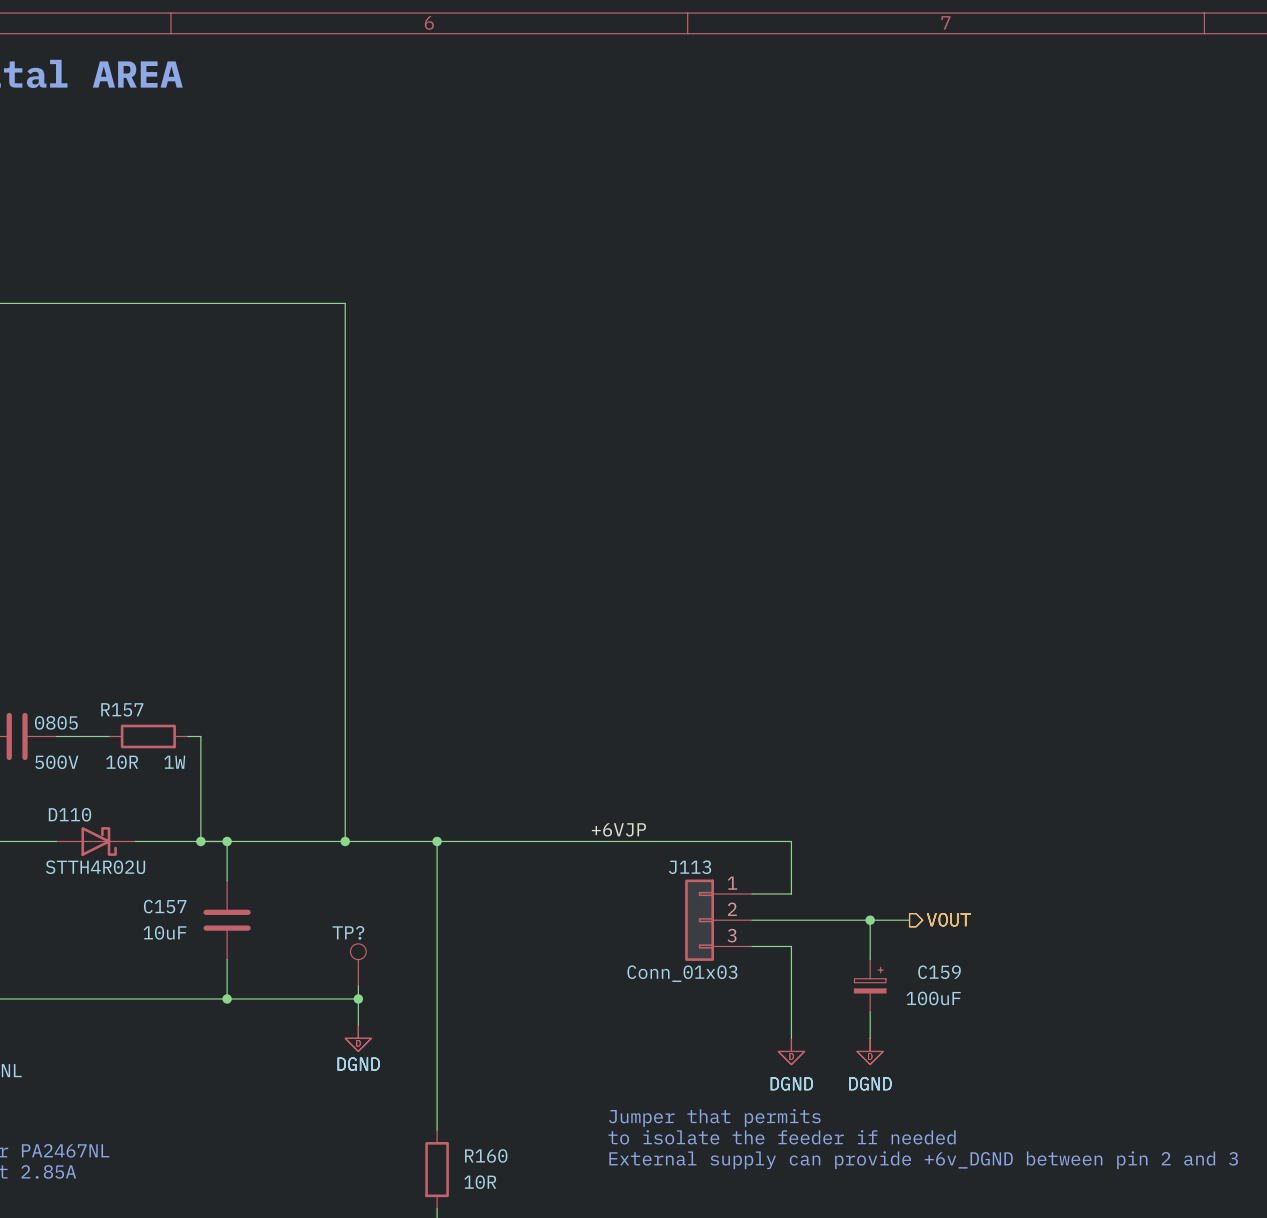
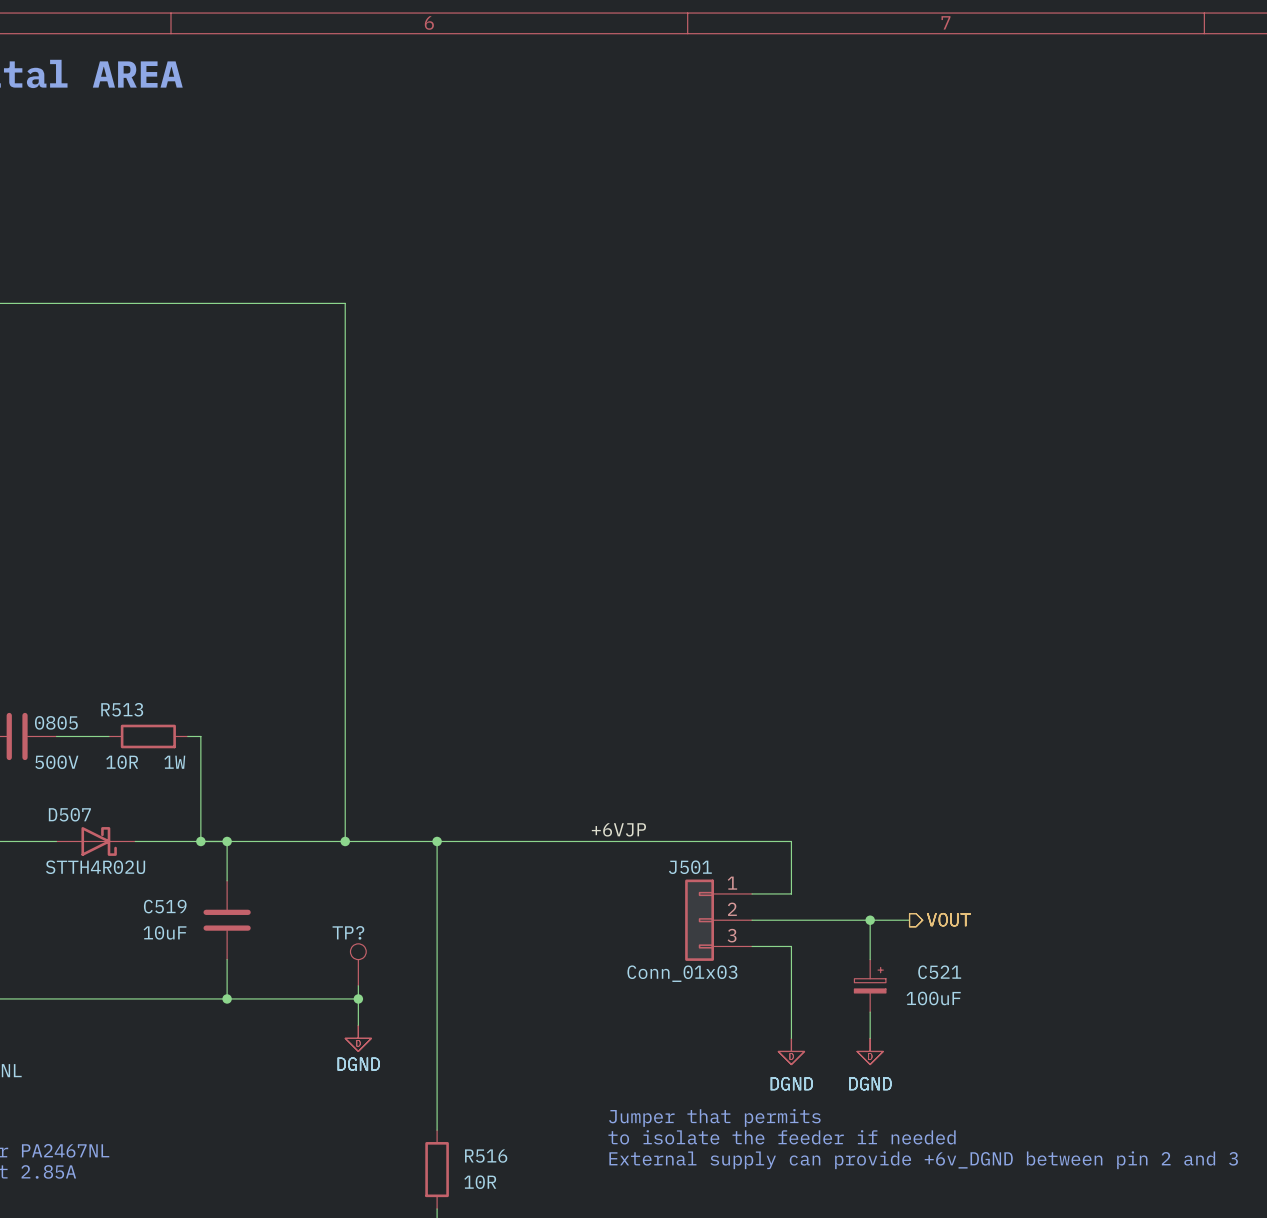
R157 name: R157 (122, 709) -> R513 (122, 709)
D110 name: D110 (69, 814) -> D507 (69, 814)
J113 name: J113 (690, 867) -> J501 (690, 867)
C157 name: C157 (165, 906) -> C519 (165, 906)
C159 name: C159 (939, 972) -> C521 (939, 972)
R160 name: R160 (486, 1155) -> R516 (486, 1156)

